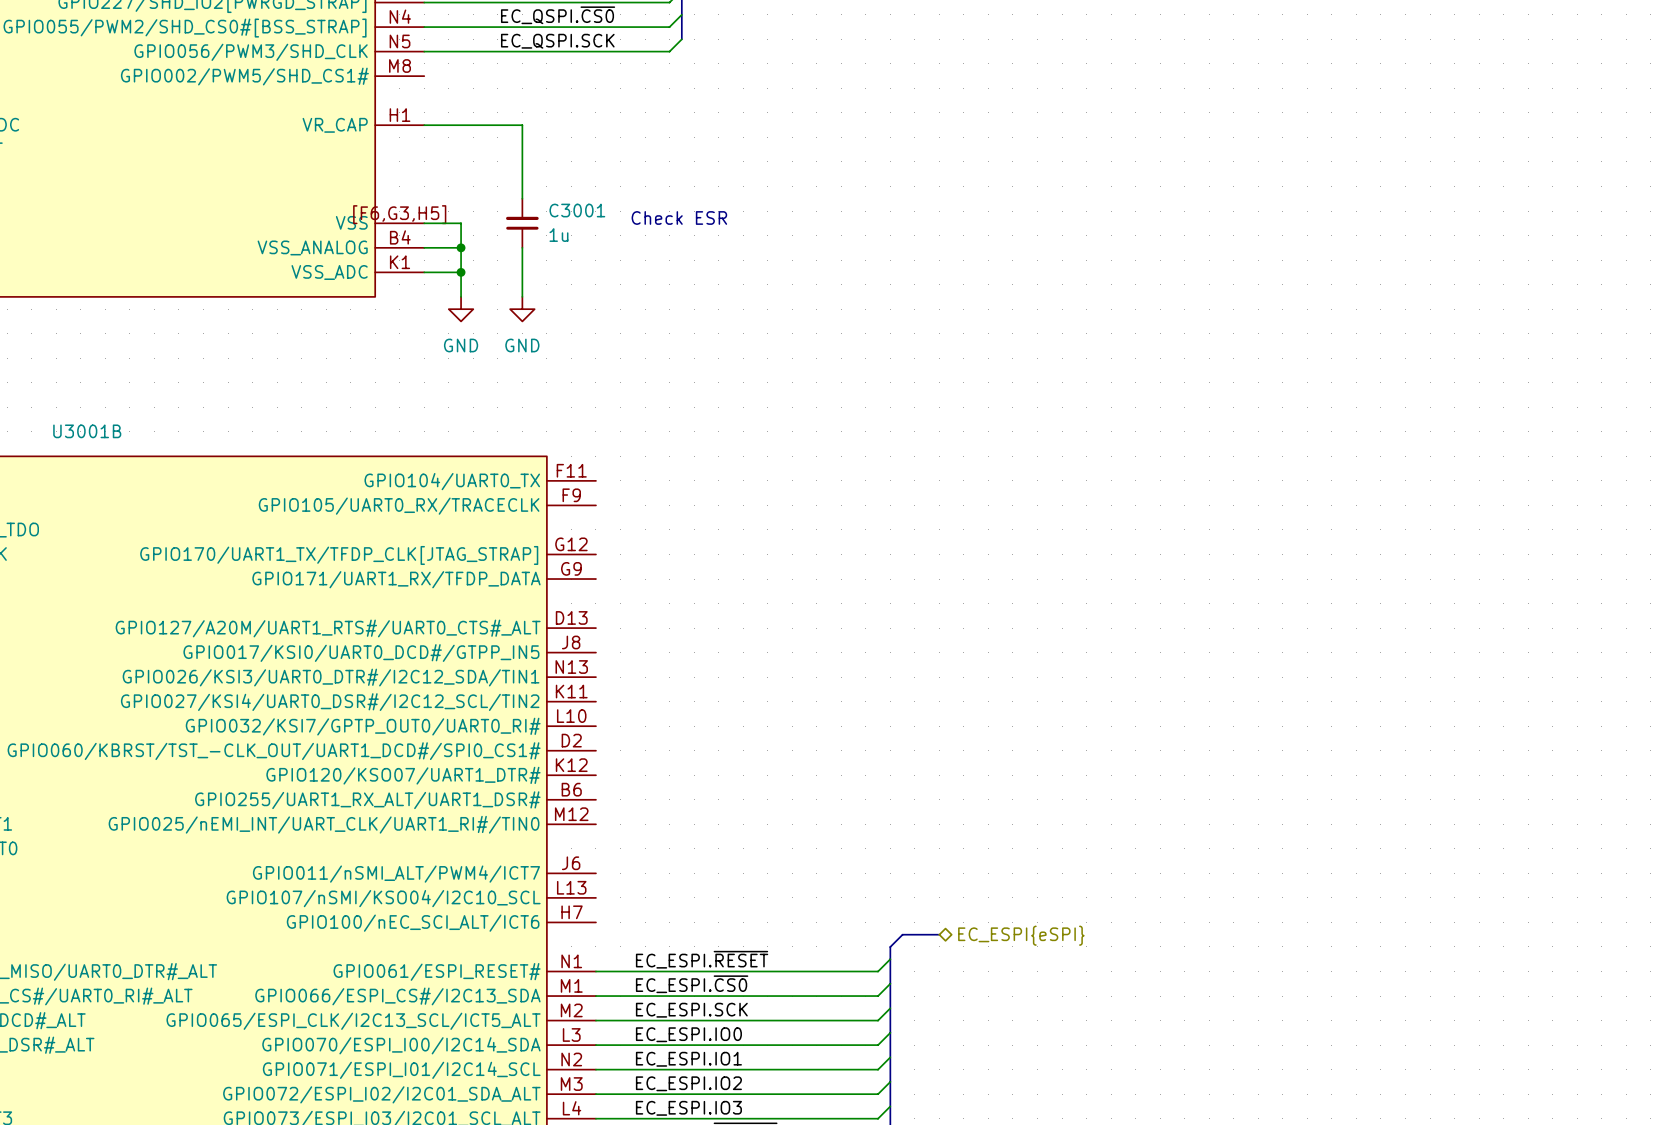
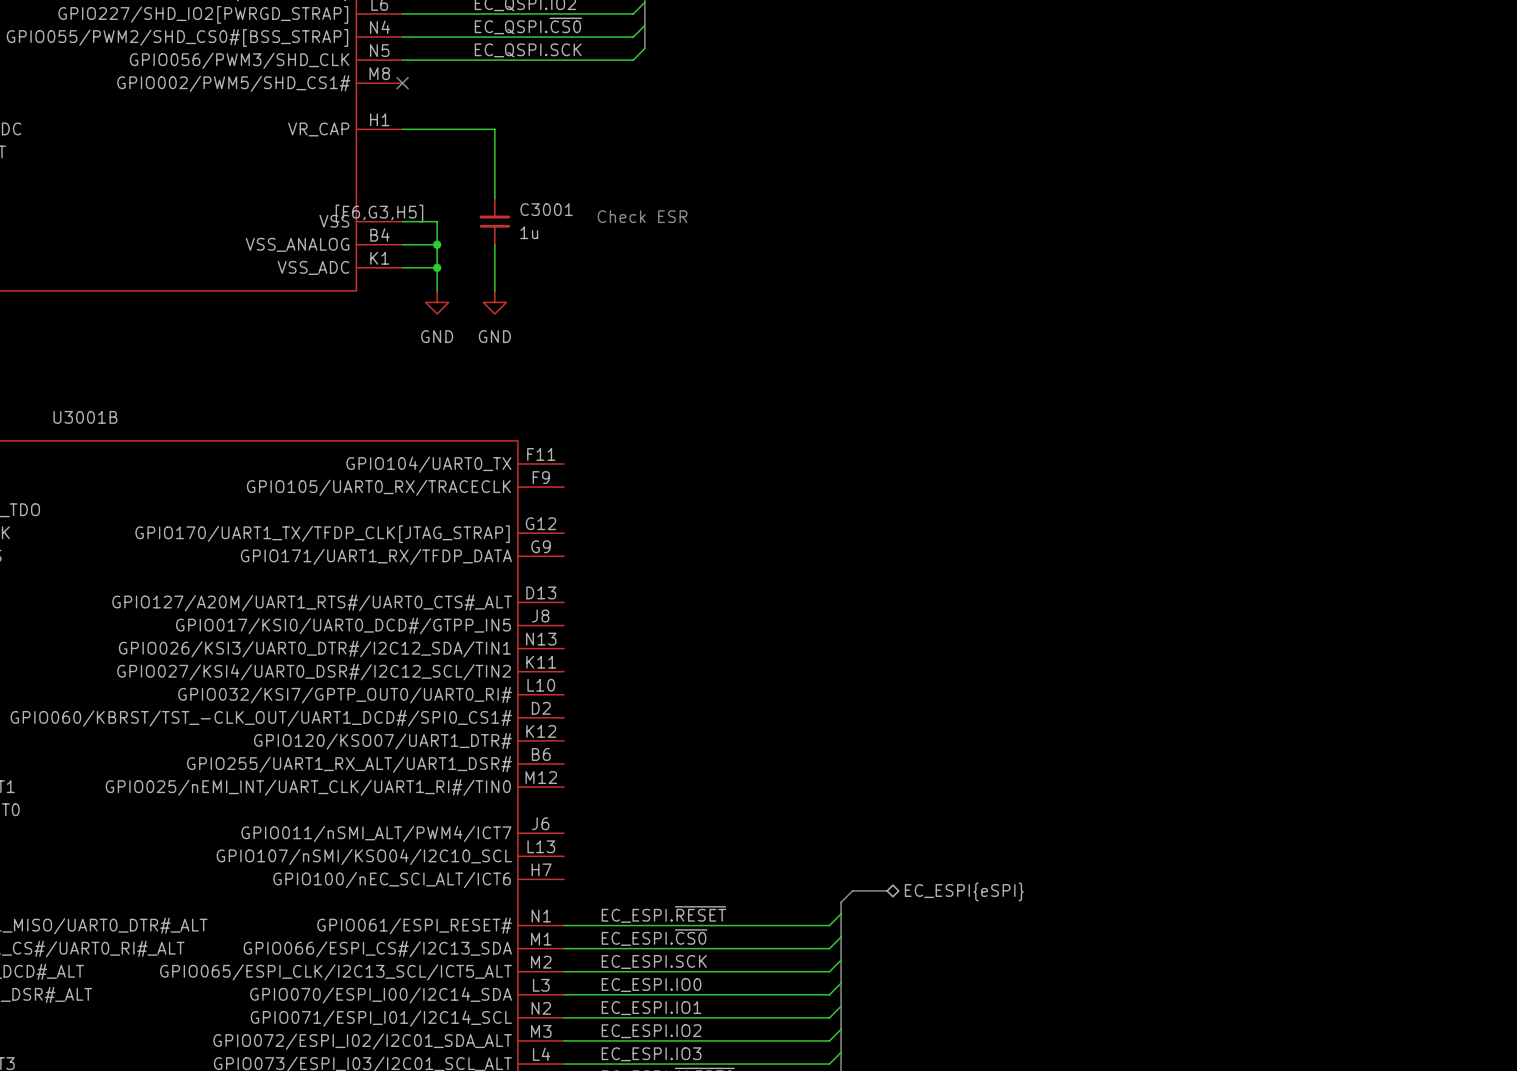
no-connect mark: none -> (402, 83)

